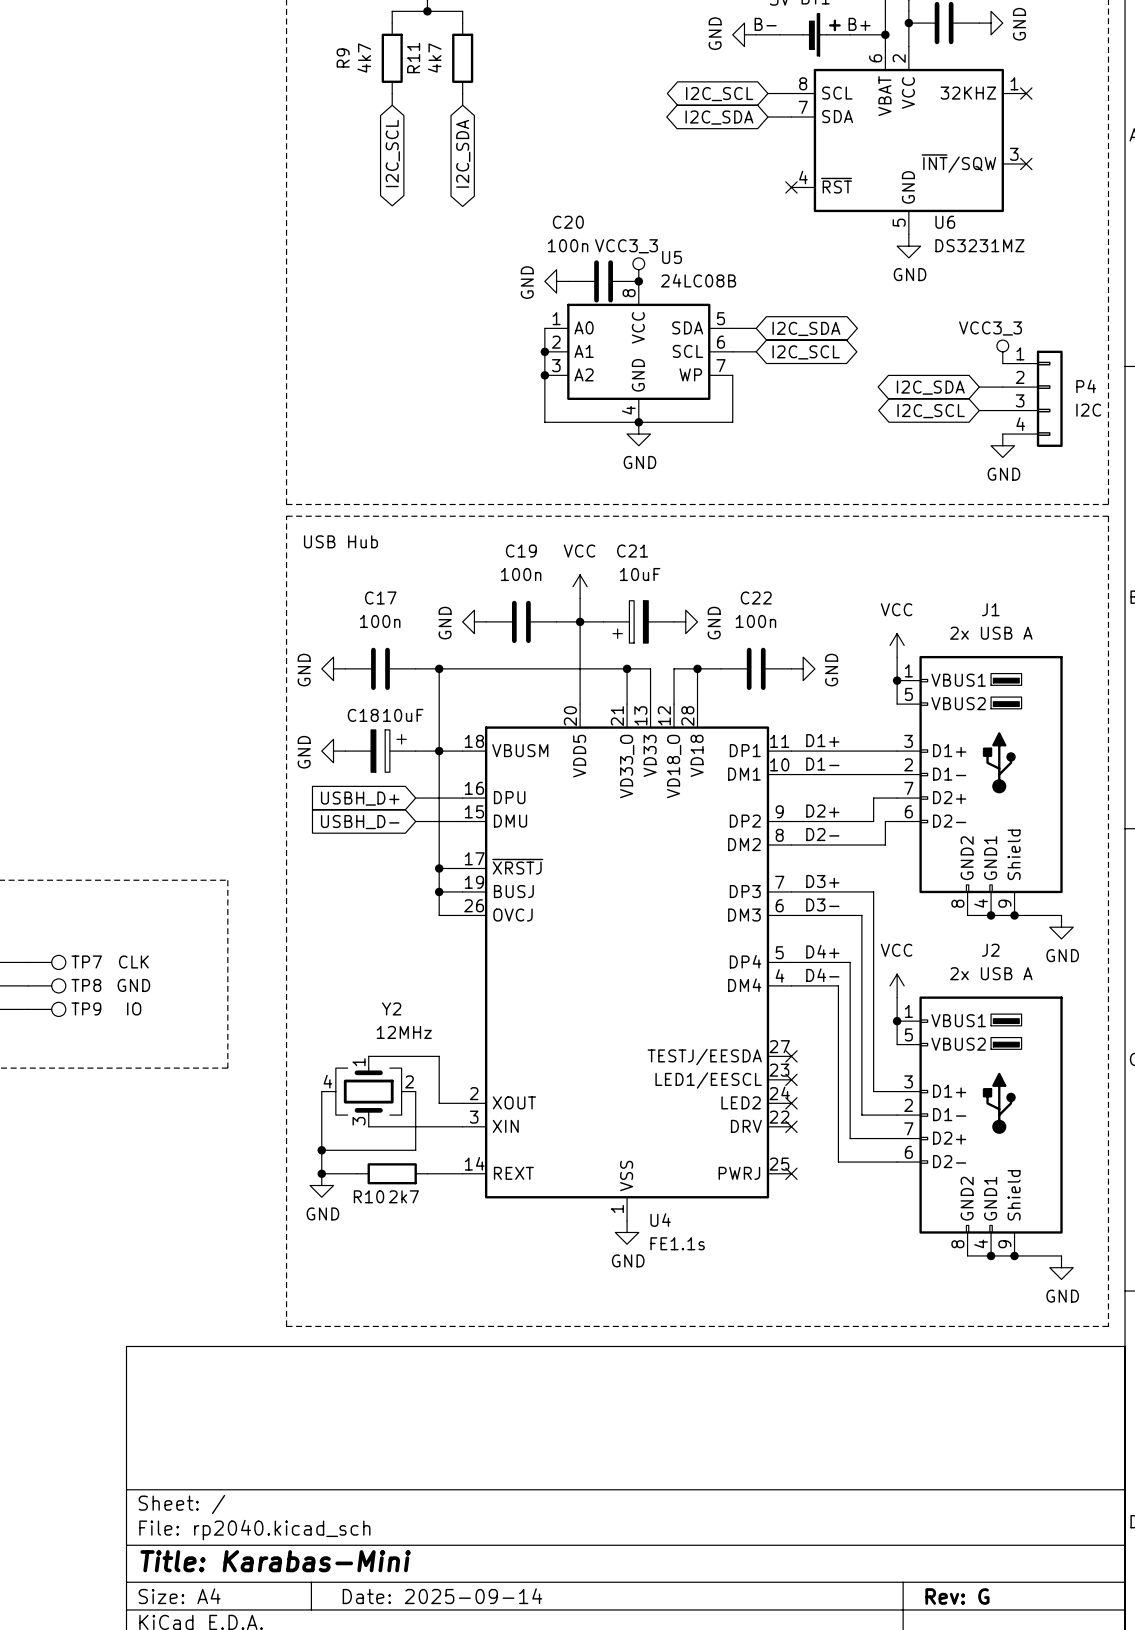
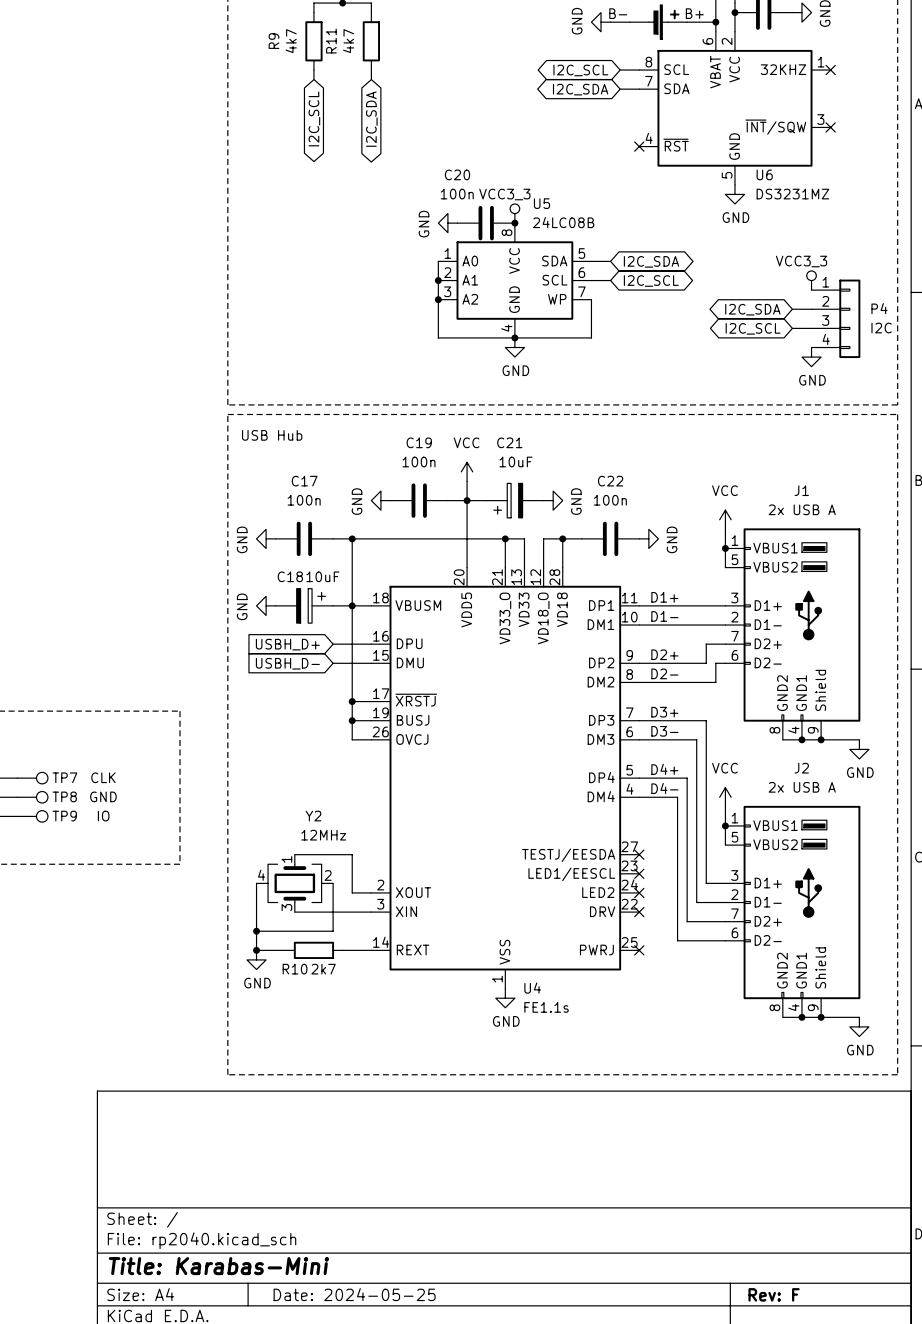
title block: Date: 2025-09-14 (442, 1596) -> Date: 2024-05-25 (354, 1294)
title block: Rev: G (957, 1596) -> Rev: F (774, 1294)

